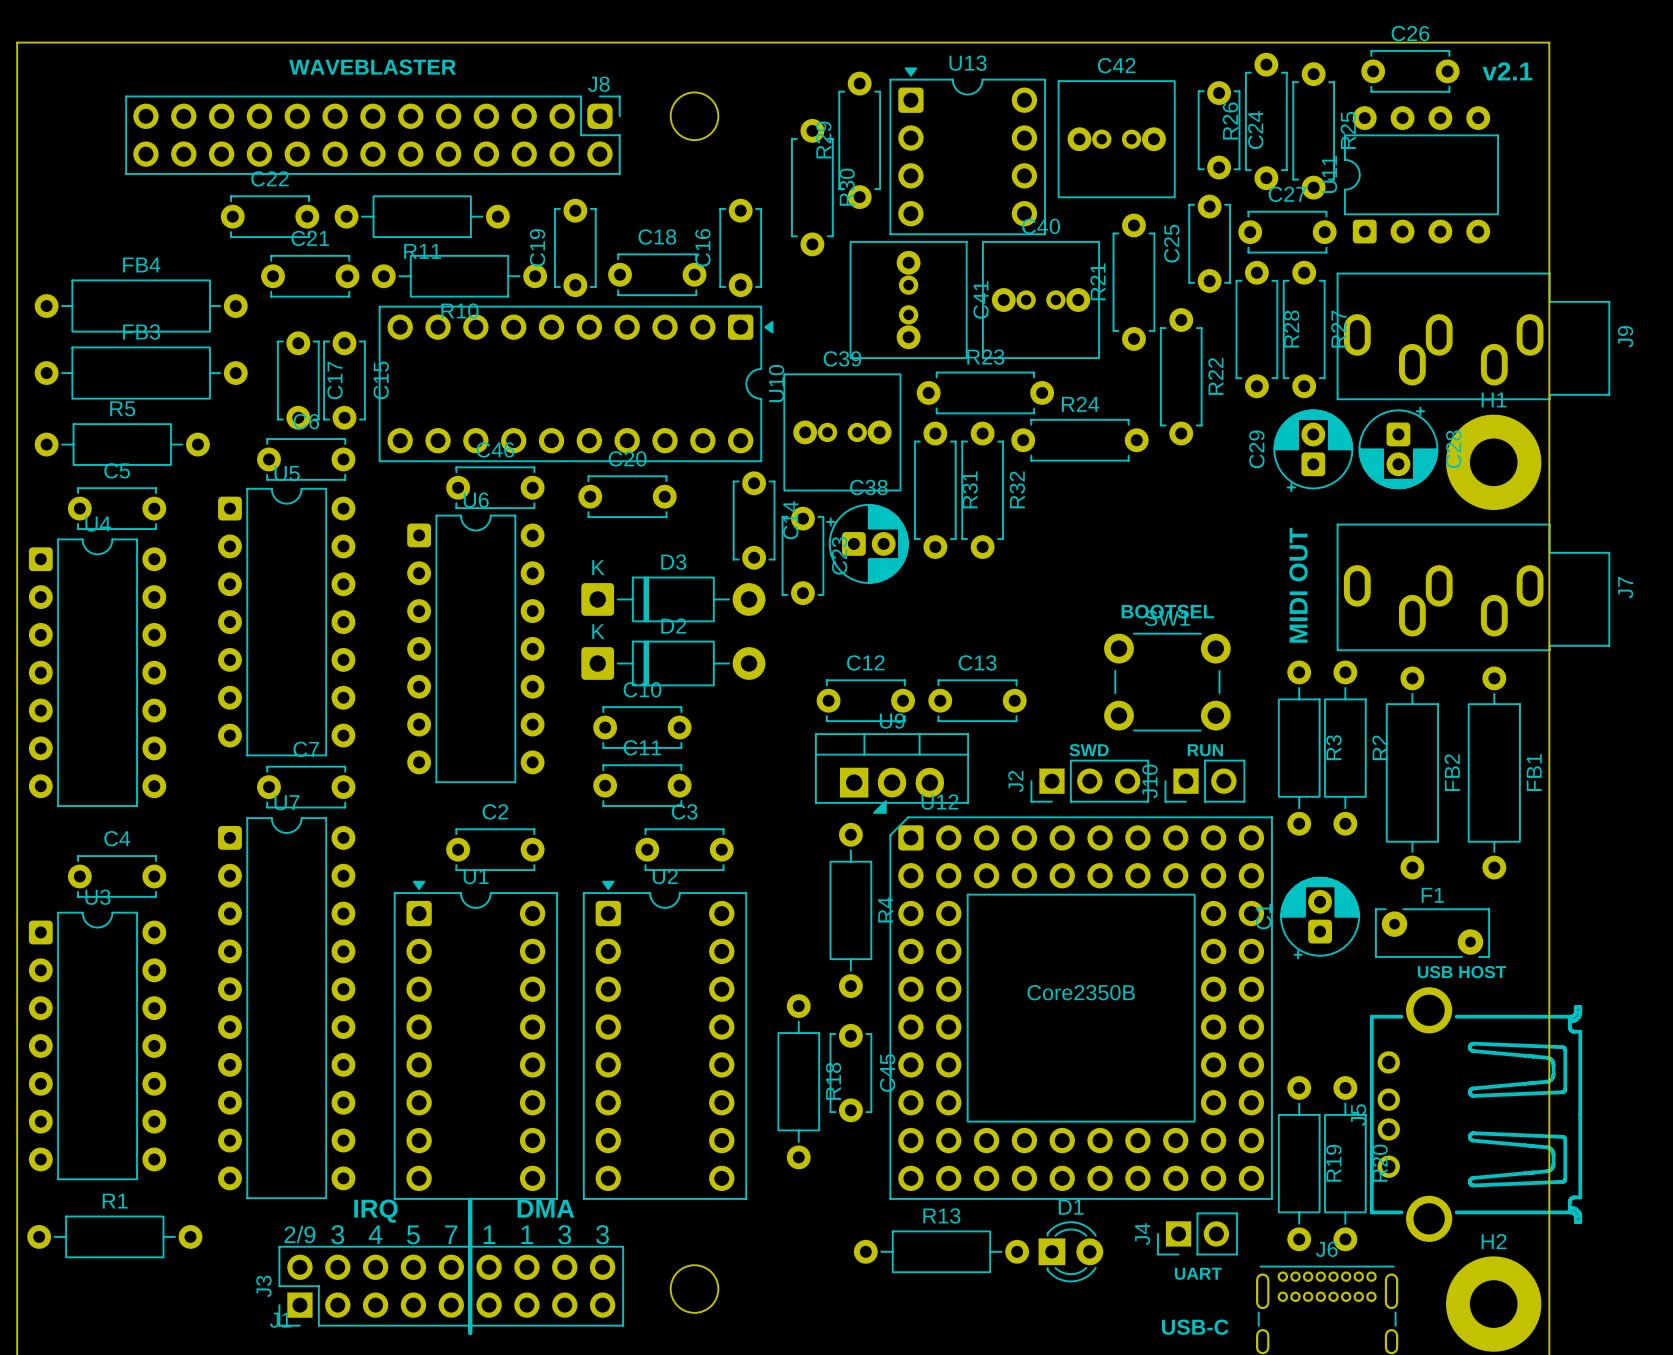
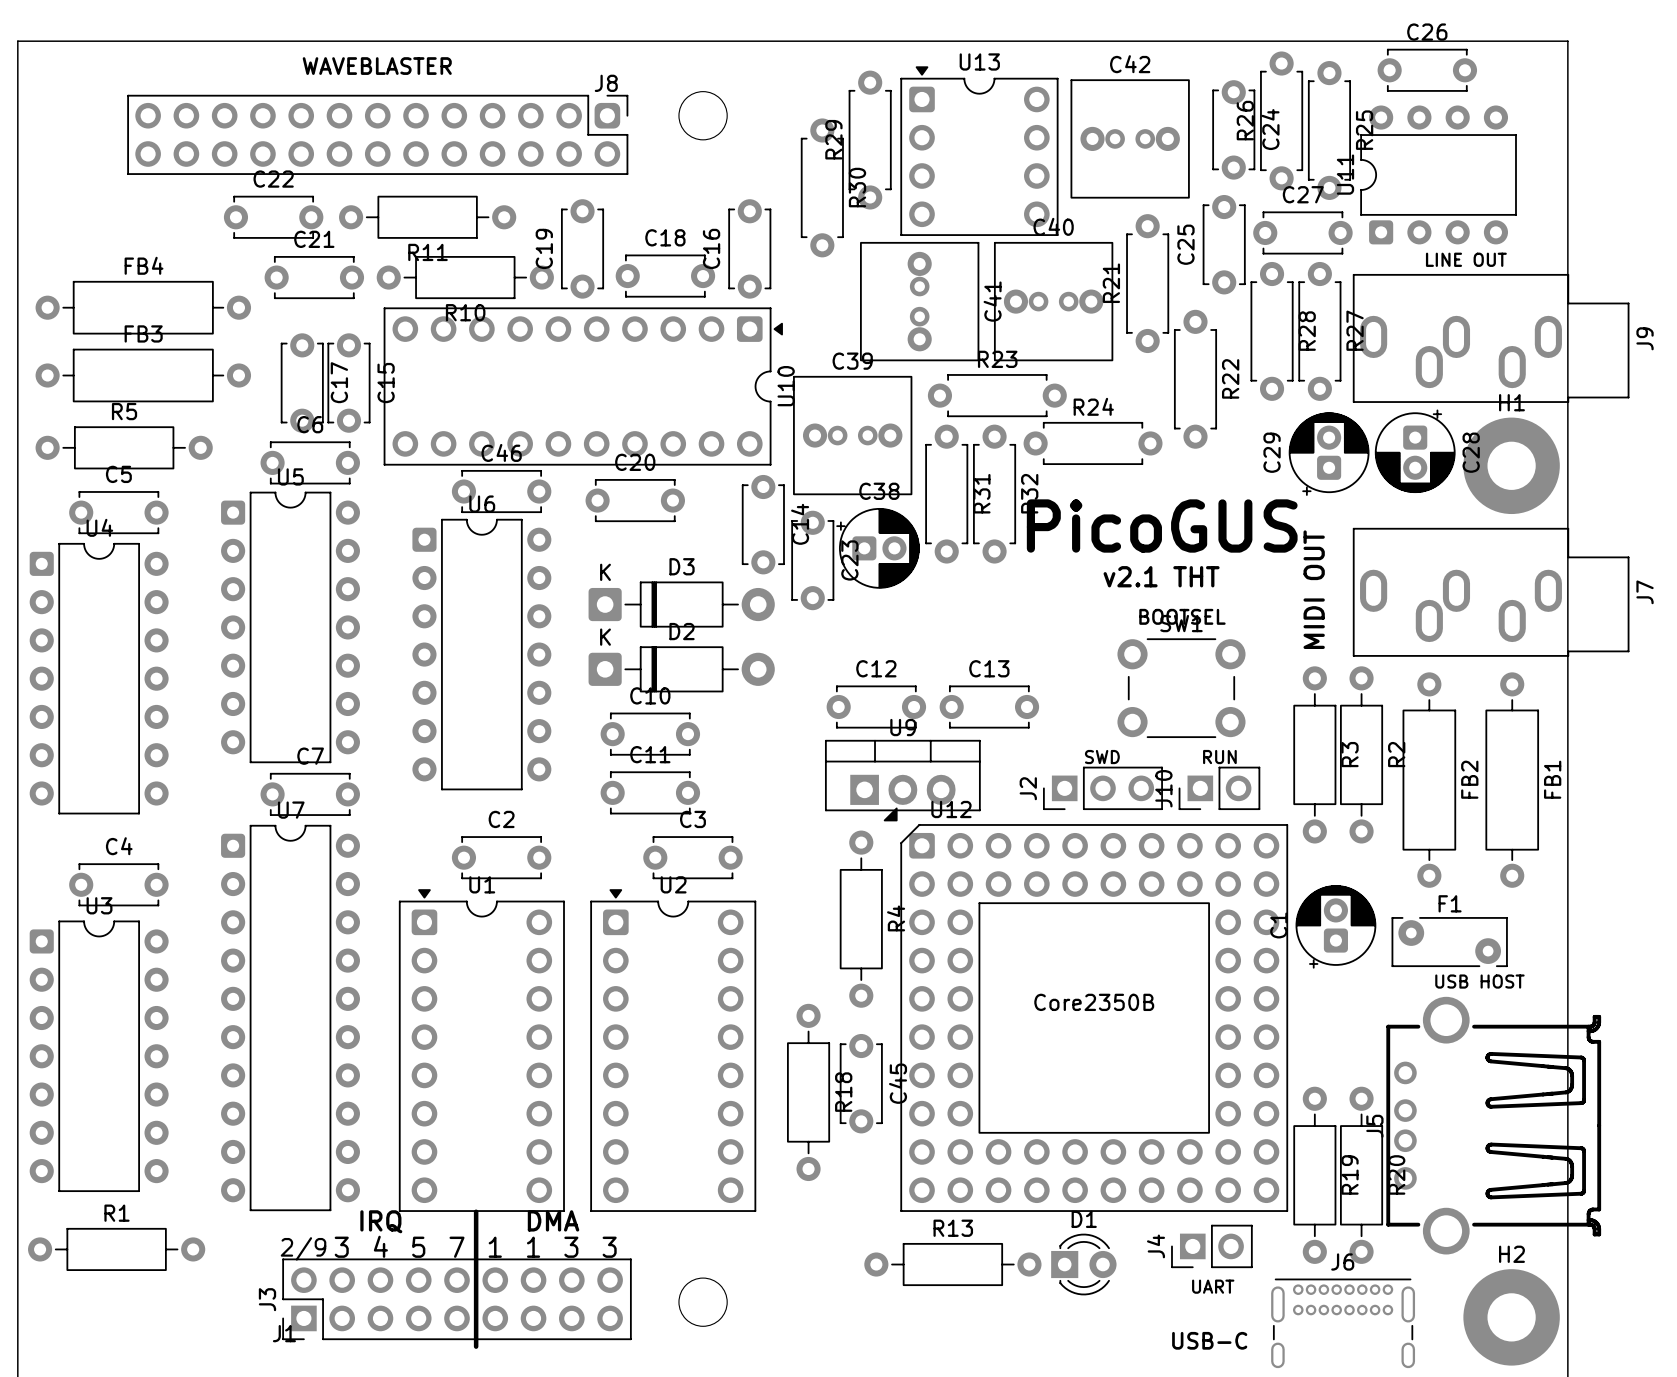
text: v2.1 (1507, 71) -> none
text: none -> LINE OUT (1466, 259)
text: none -> PicoGUS (1162, 526)
text: none -> v2.1 THT (1161, 576)

